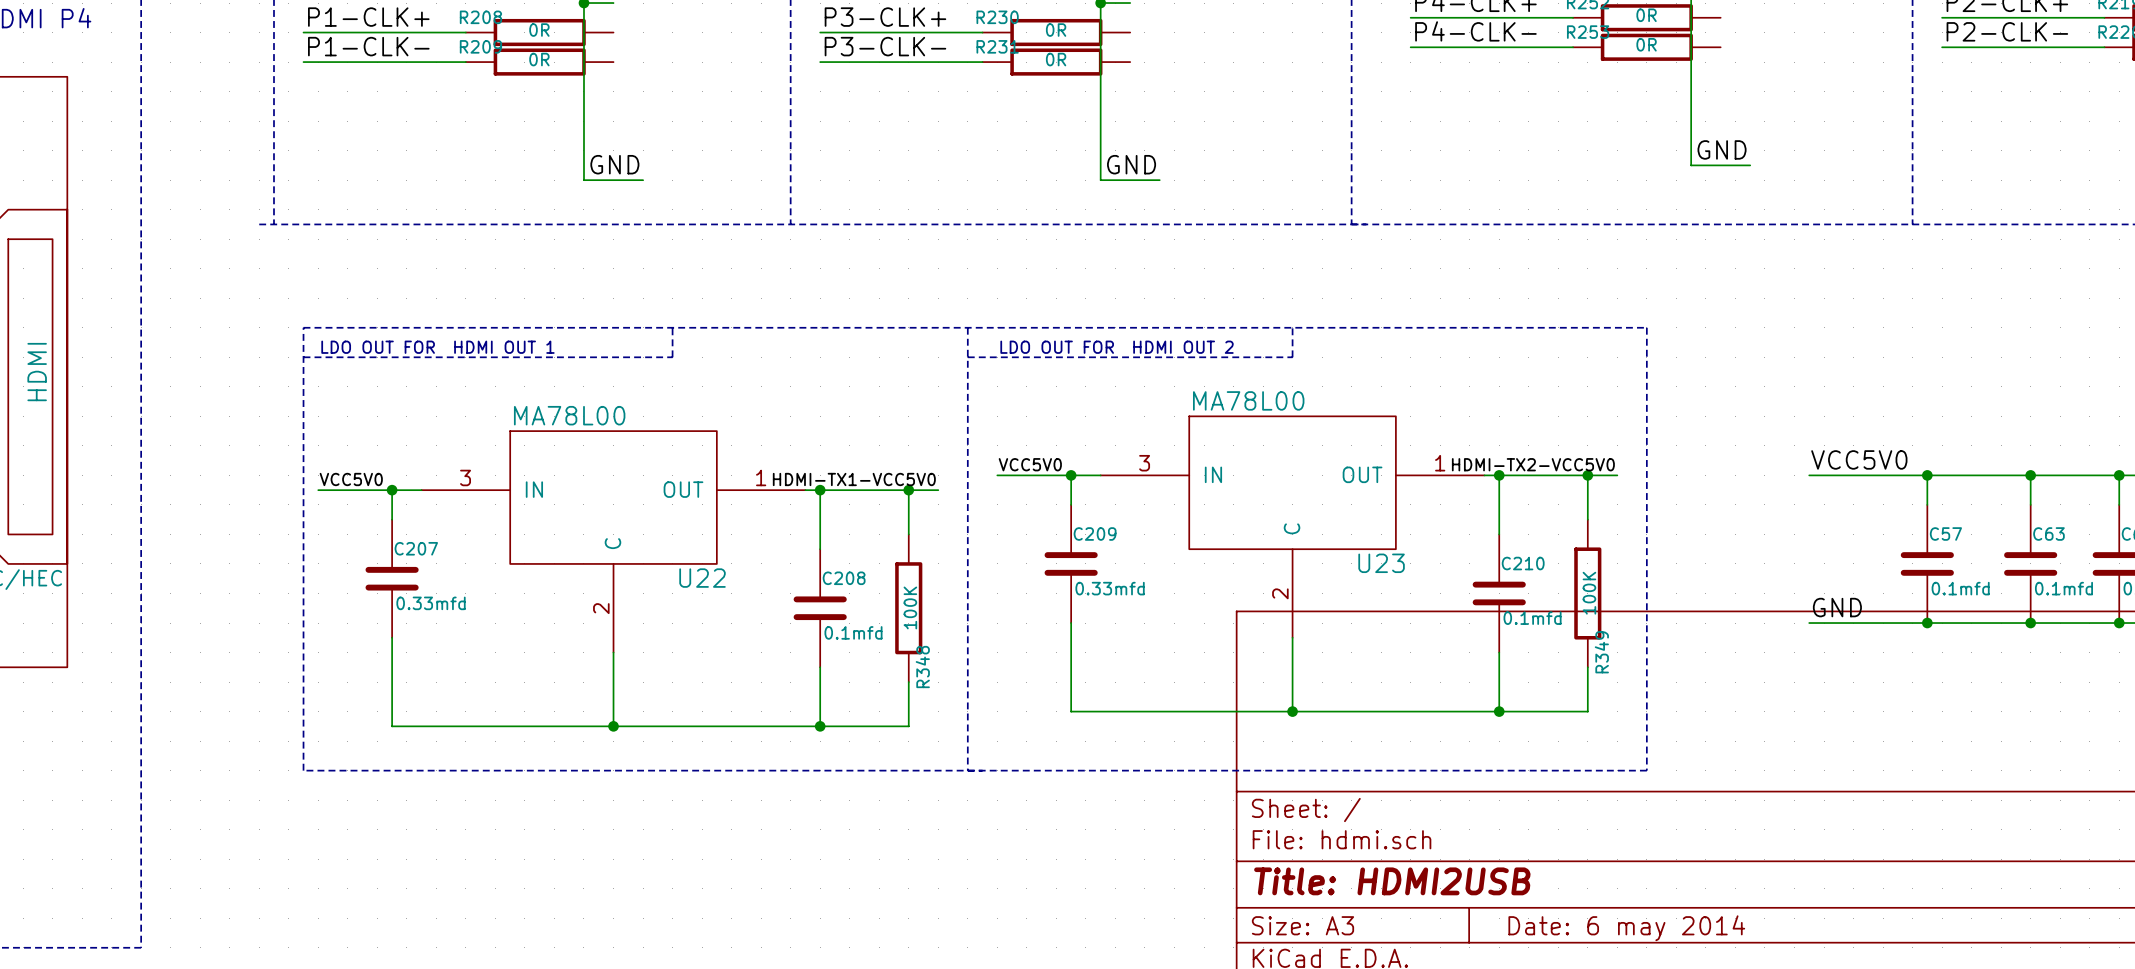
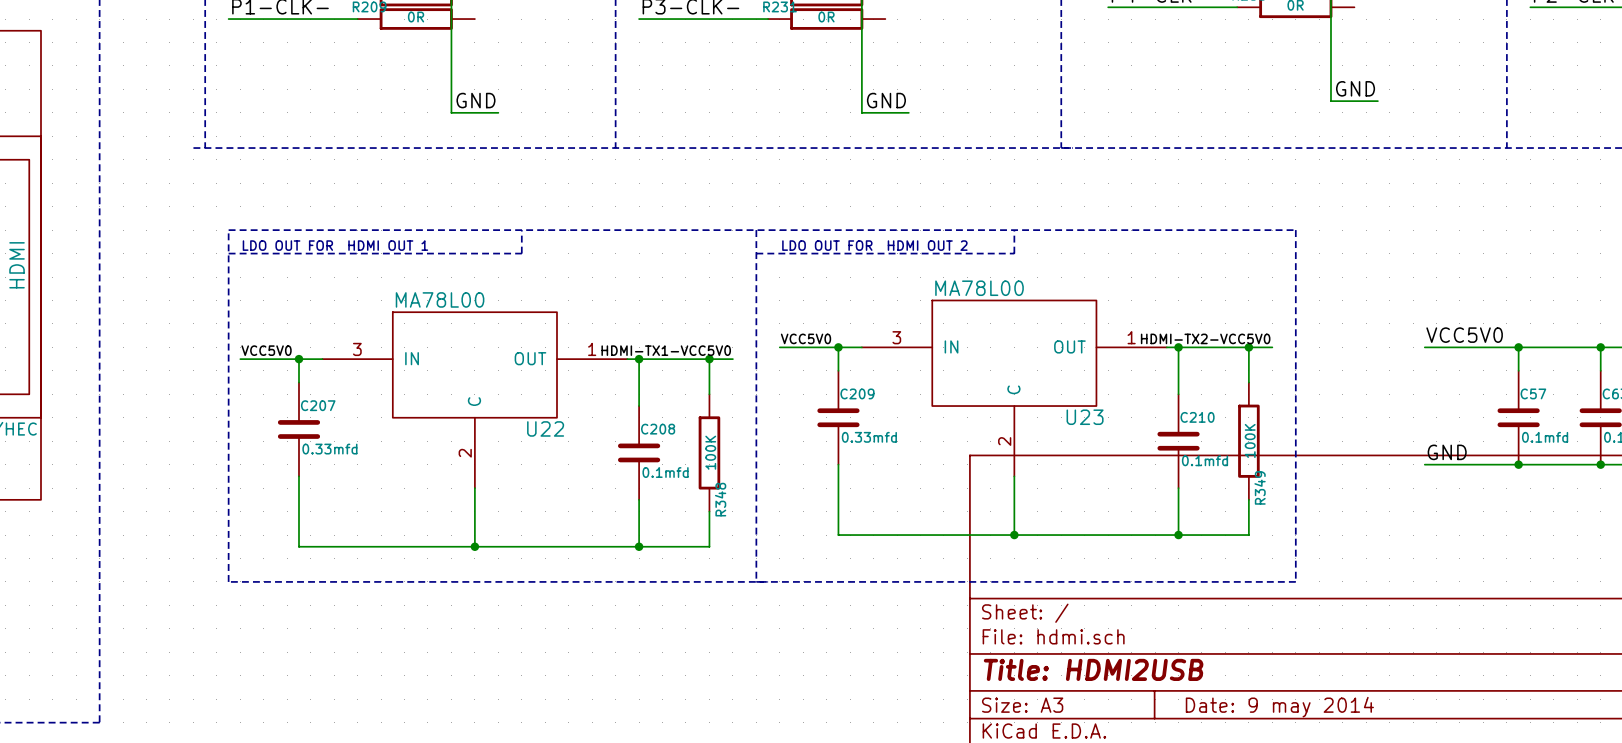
title block: Date: 6 may 2014 (1626, 928) -> Date: 9 may 2014 (1279, 707)

